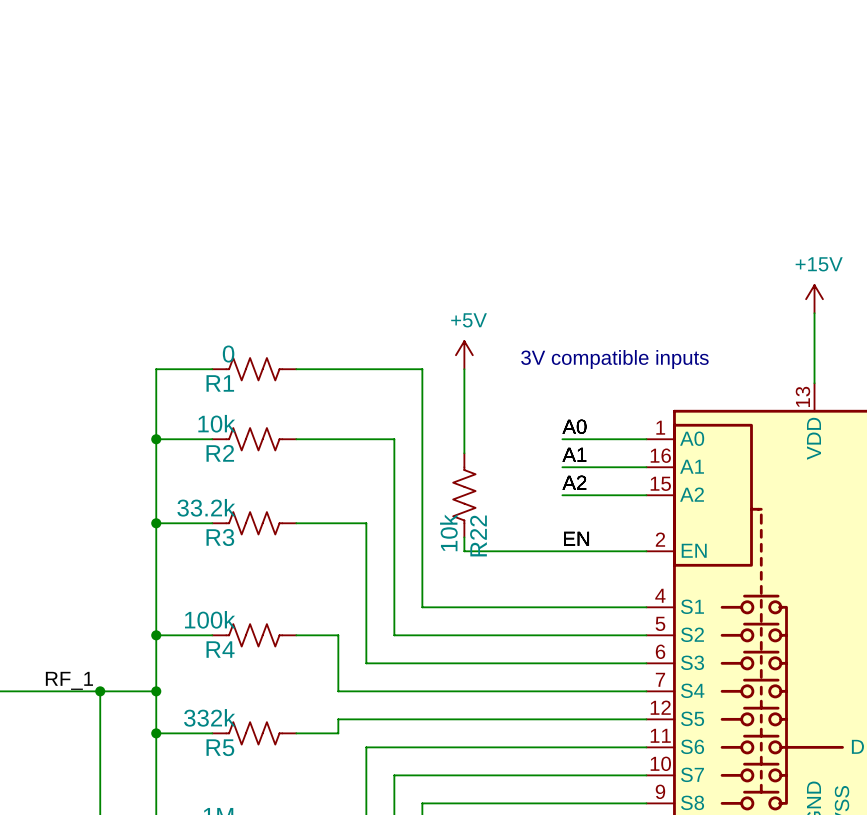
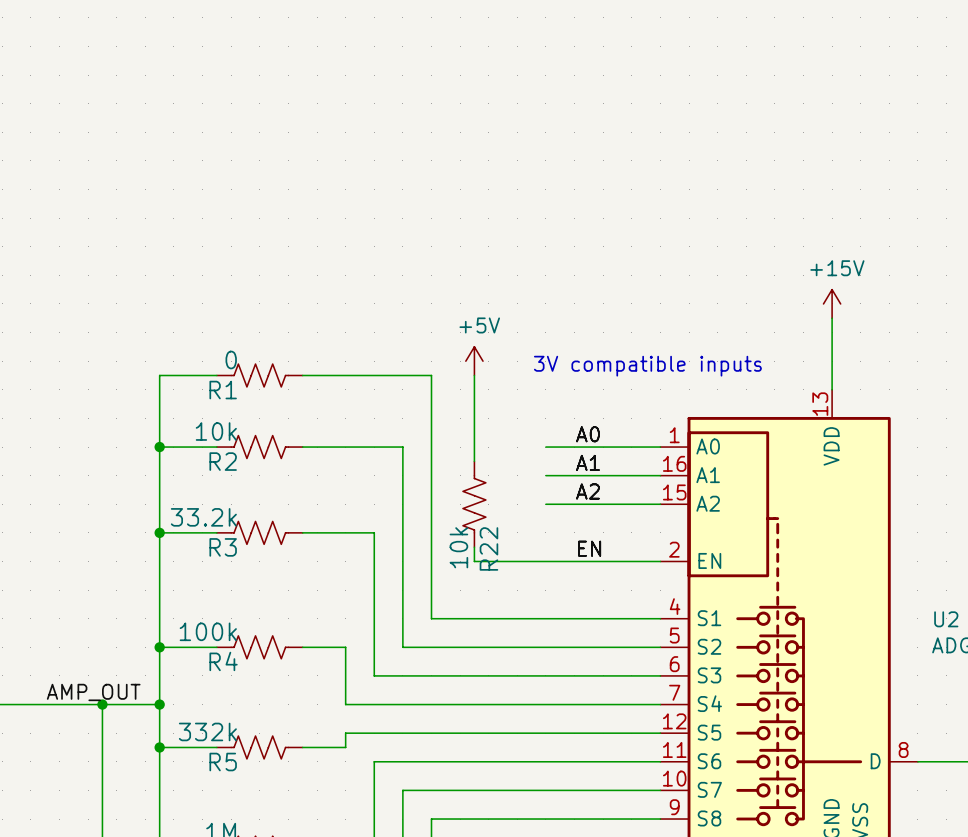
wire: none -> (545, 447) (574, 447)
wire: none -> (545, 475) (574, 475)
wire: none -> (545, 504) (574, 504)
label: RF_1 (69, 680) -> AMP_OUT (93, 692)

